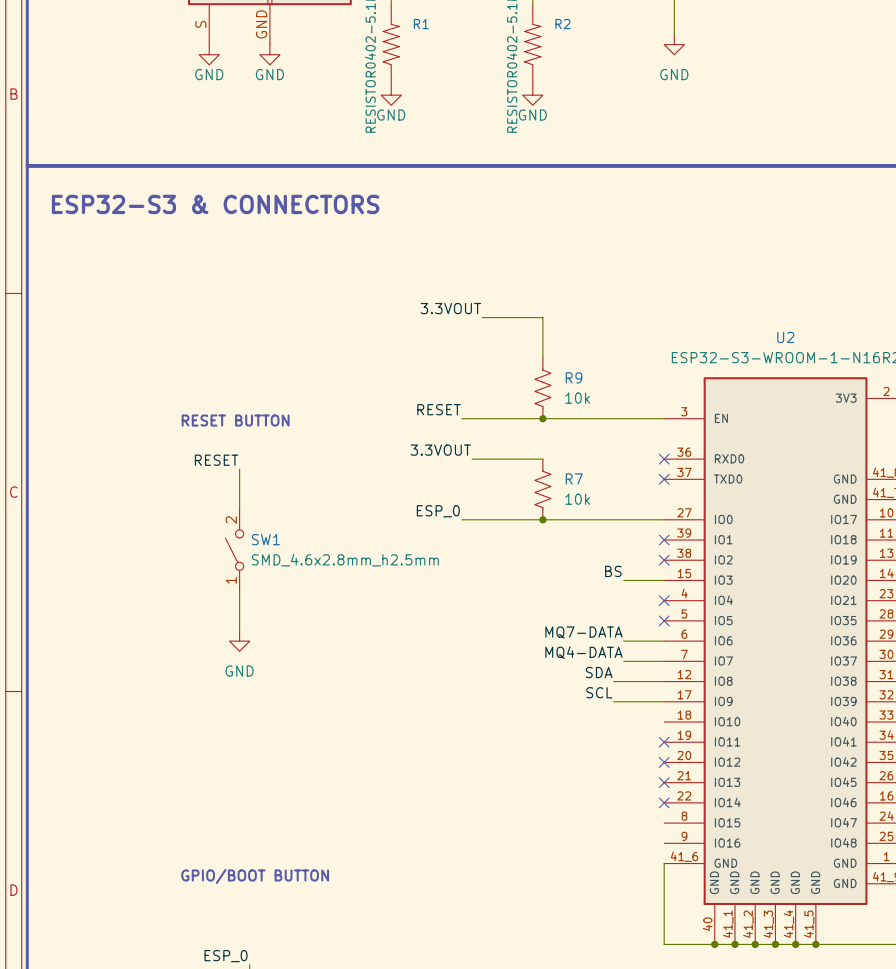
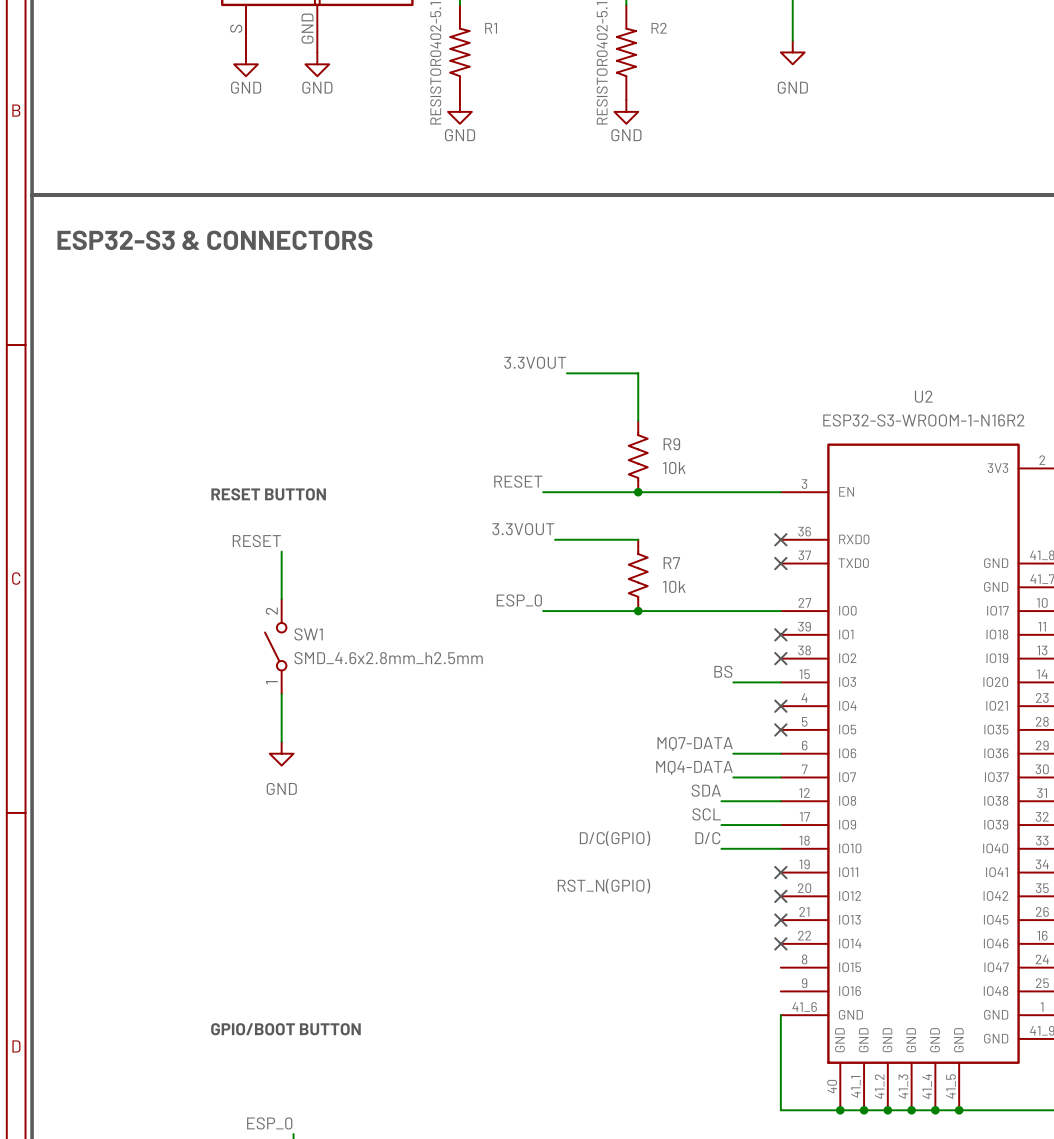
label: none -> D/C (707, 838)
label: none -> D/C(GPIO) (615, 838)
wire: none -> (721, 848) (780, 848)
label: none -> RST_N(GPIO) (603, 886)

